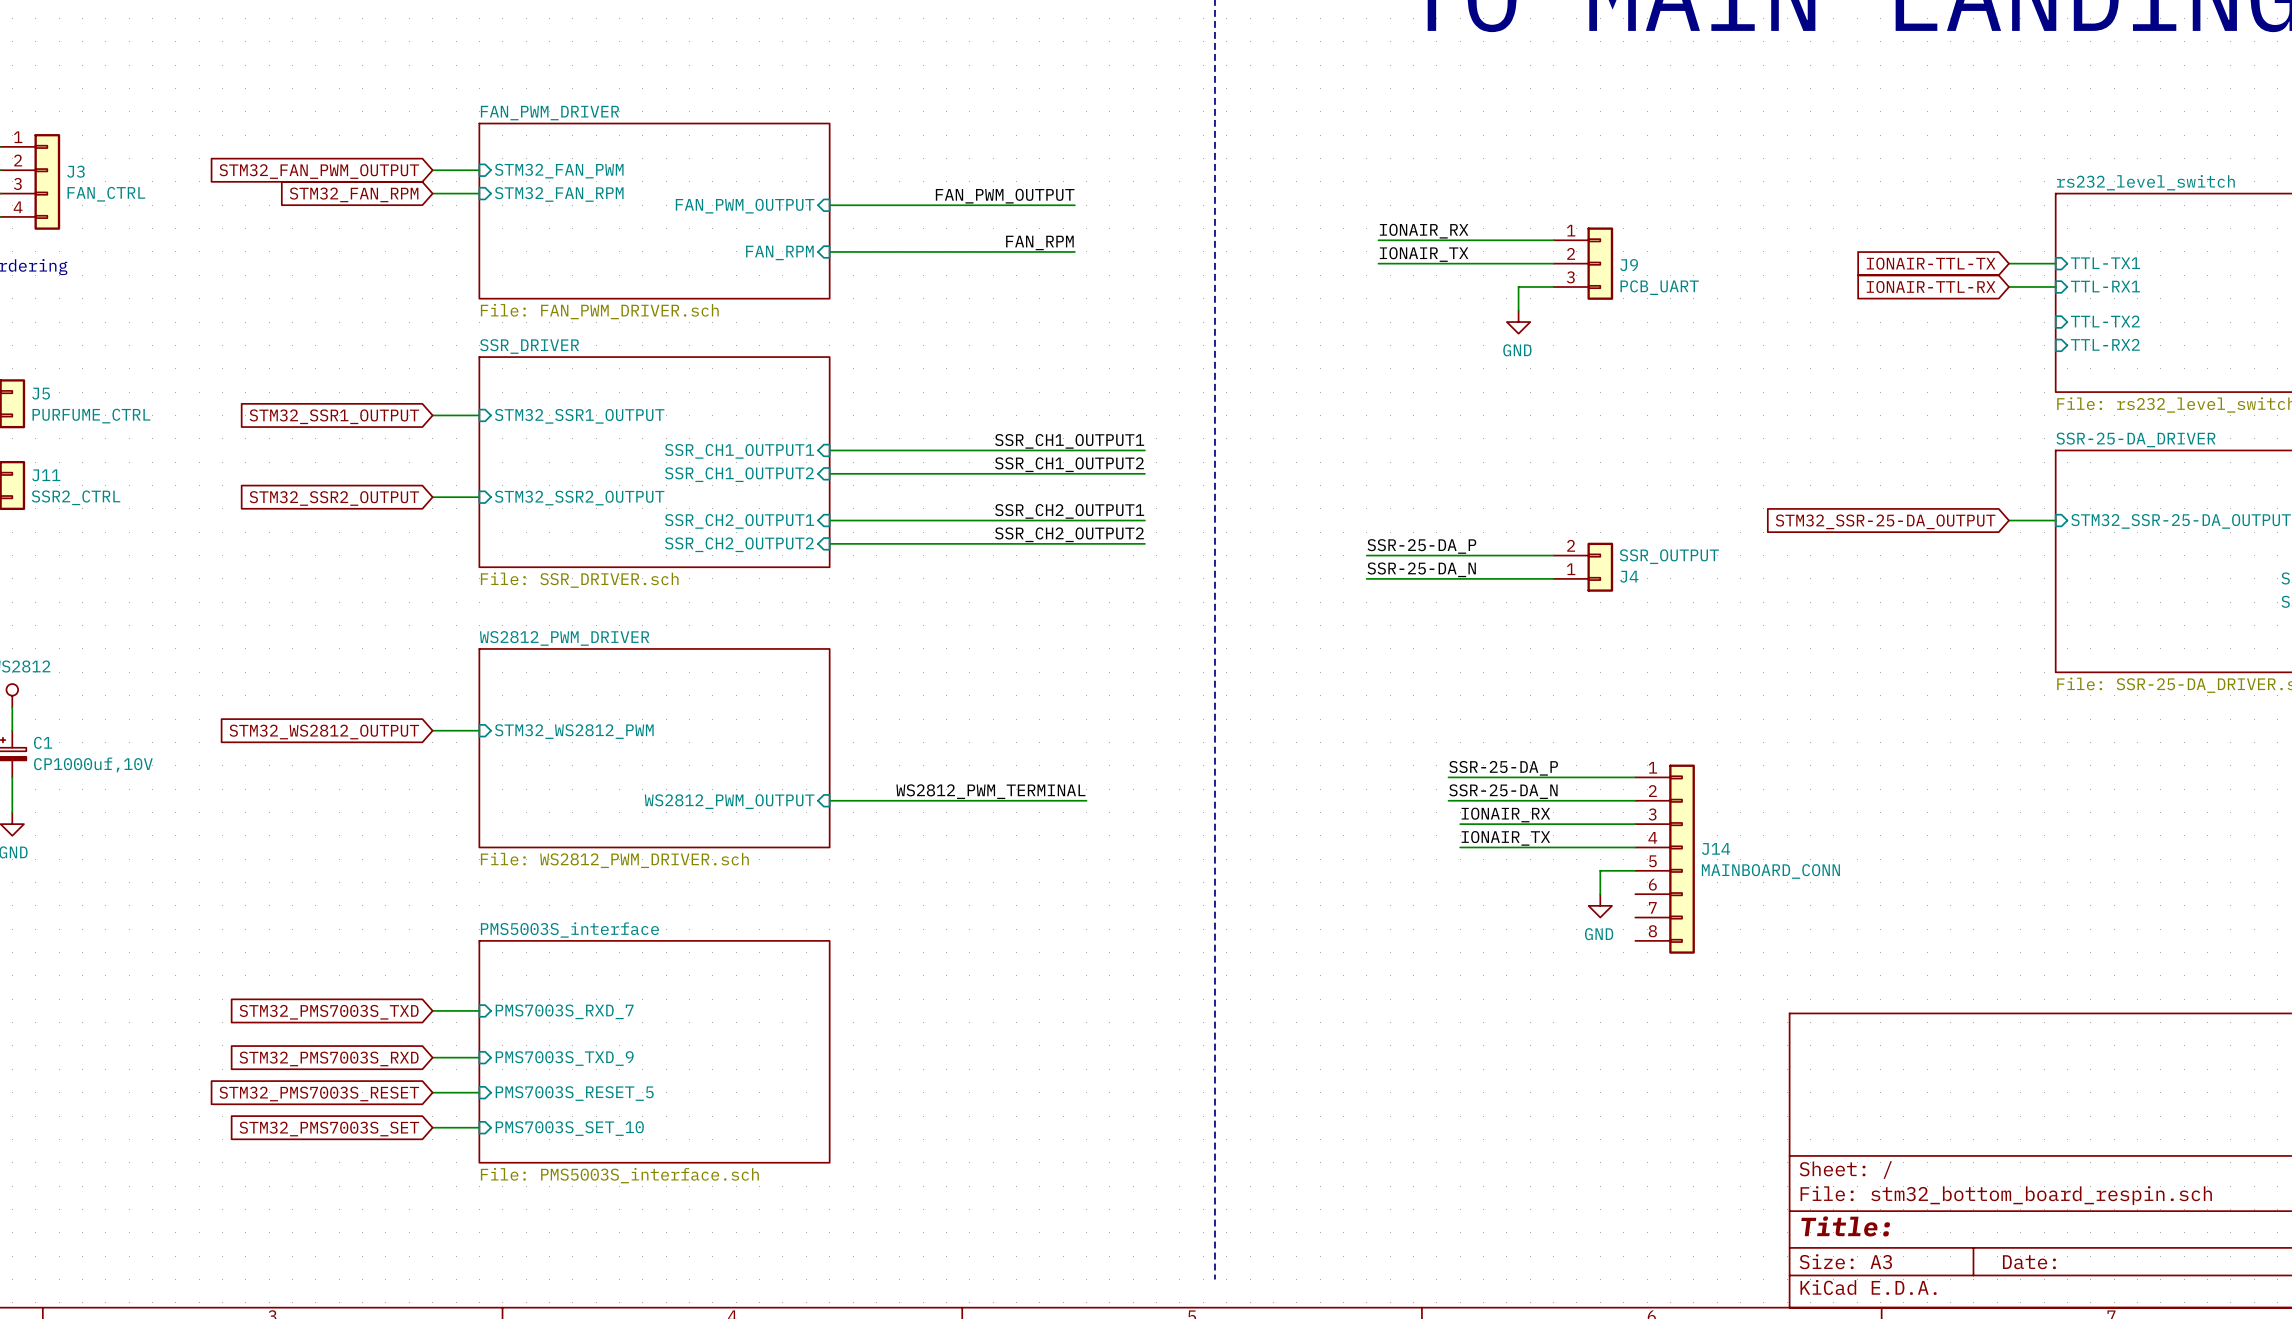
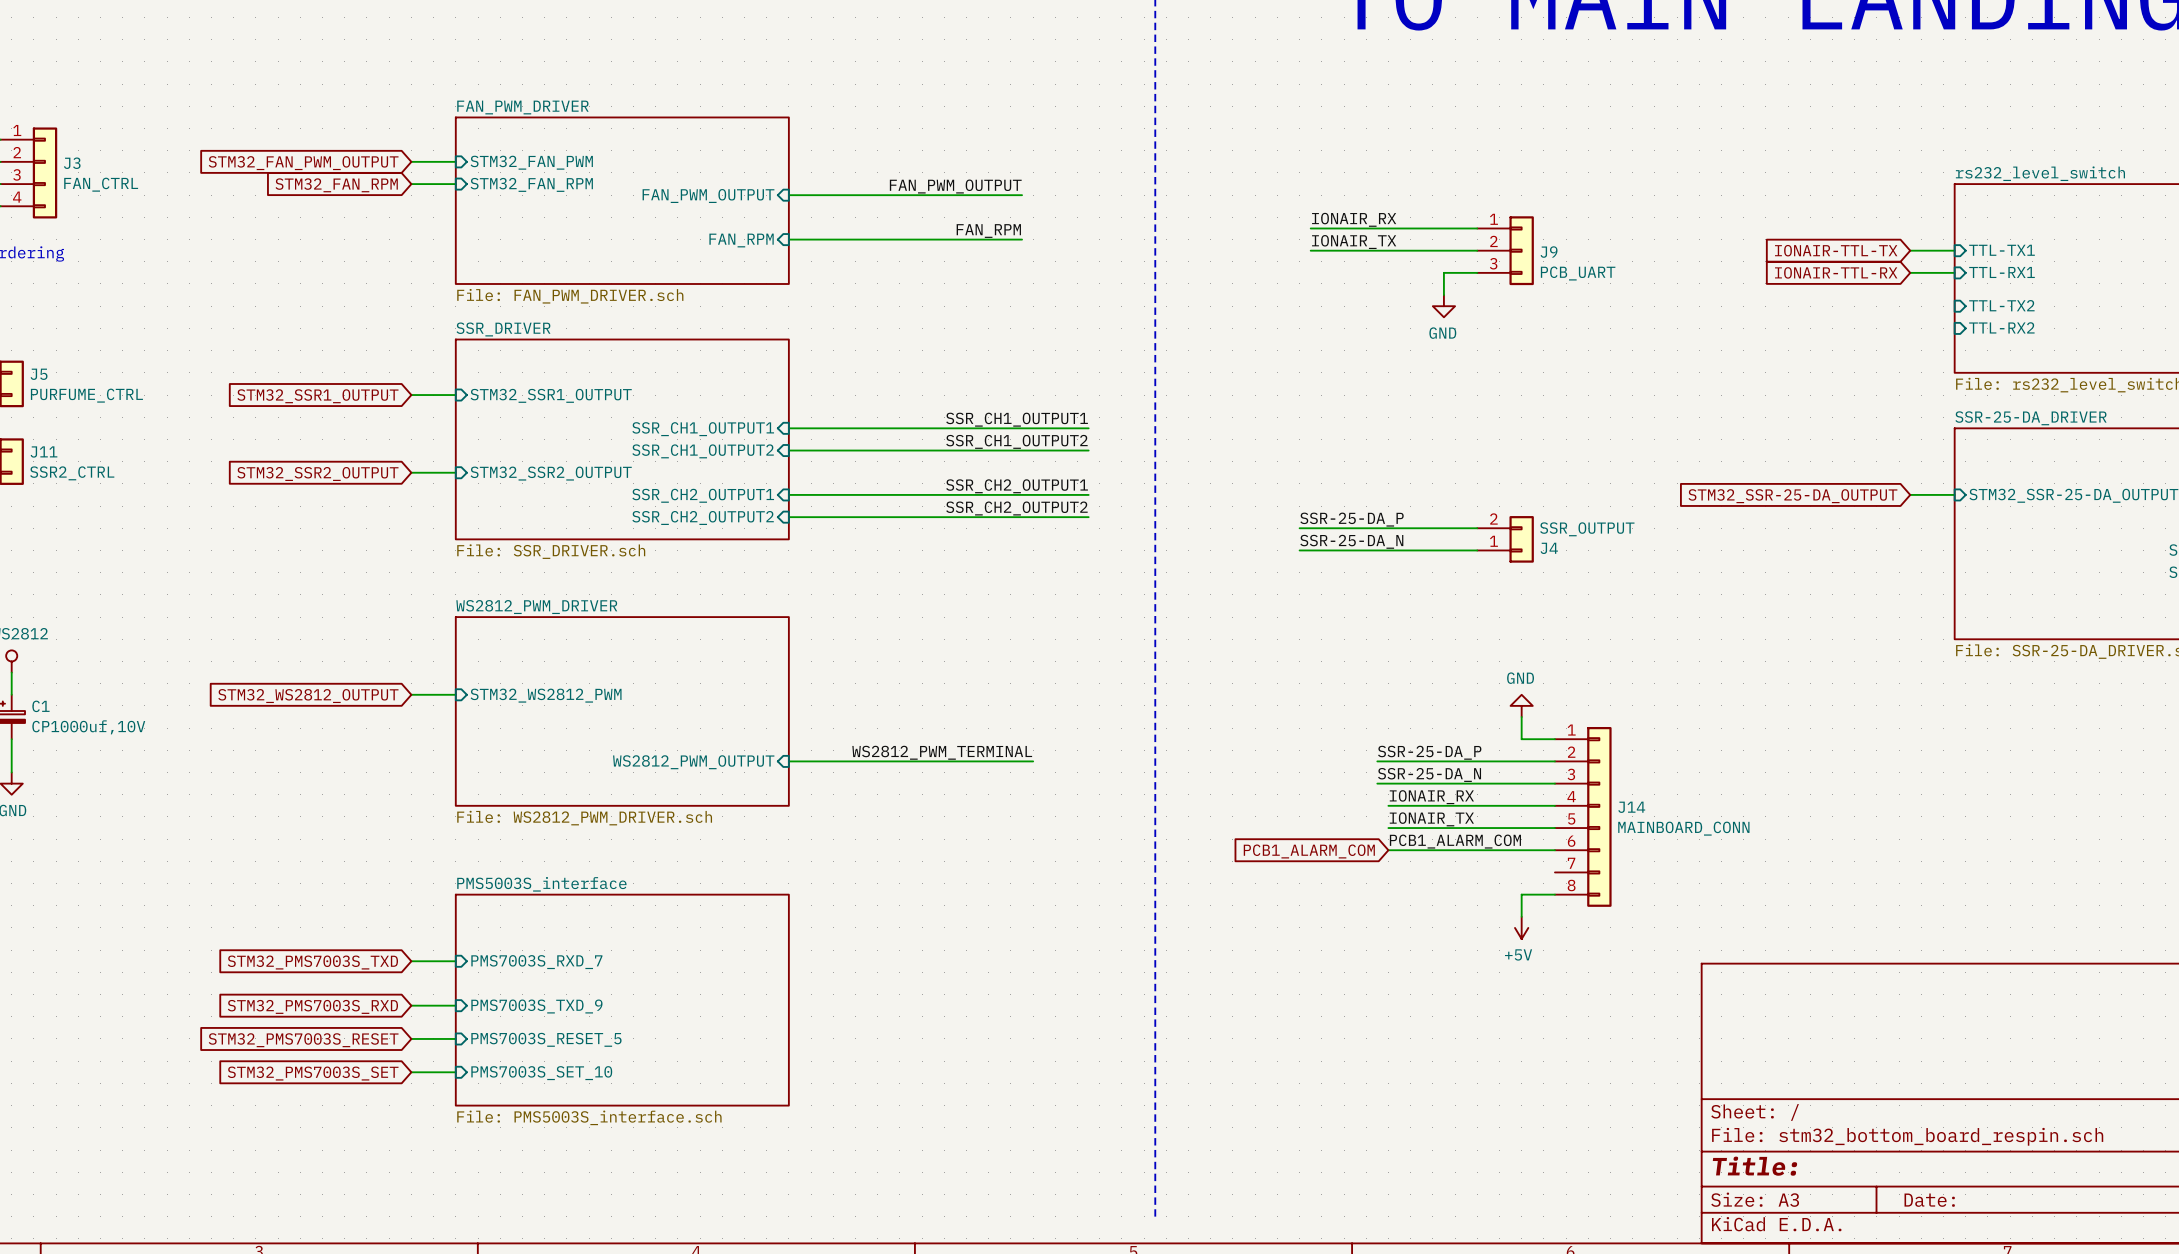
label: SSR-25-DA_P (1503, 768) -> none
wire: (1448, 777) (1600, 777) -> (1521, 717) (1521, 739)
label: SSR-25-DA_N (1503, 791) -> SSR-25-DA_P (1429, 752)
label: none -> SSR-25-DA_N (1429, 774)
label: IONAIR_RX (1505, 815) -> none
wire: none -> (1377, 783) (1388, 783)
label: IONAIR_TX (1505, 838) -> IONAIR_RX (1431, 797)
label: none -> IONAIR_TX (1431, 819)
wire: (1600, 870) (1600, 894) -> (1521, 828) (1388, 828)
label: none -> PCB1_ALARM_COM (1455, 841)
wire: none -> (1388, 850) (1554, 850)
global label: none -> PCB1_ALARM_COM (1309, 851)
power symbol rotation: 0° (1600, 905) -> 180° (1521, 705)
power symbol position: GND (1600, 905) -> GND (1521, 705)
wire: none -> (1554, 894) (1521, 894) (1521, 916)
power symbol: none -> +5V (1521, 927)

